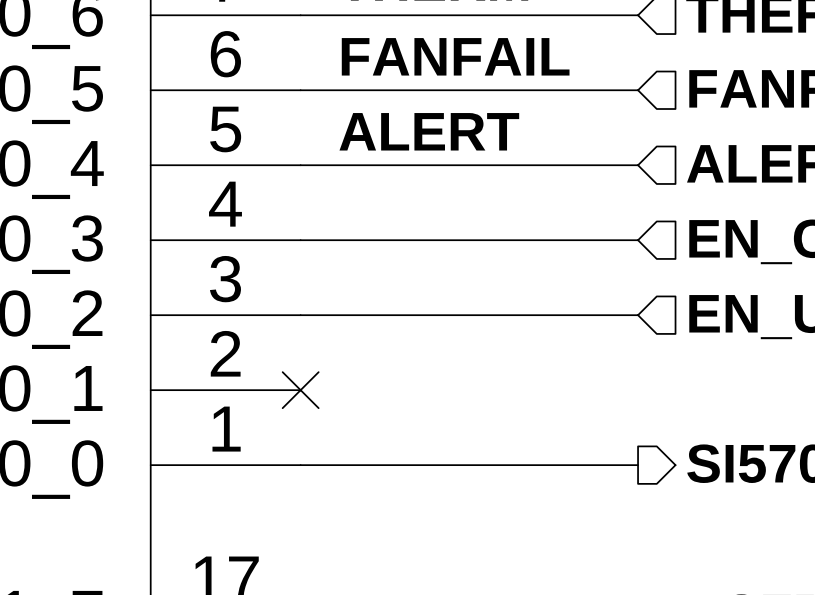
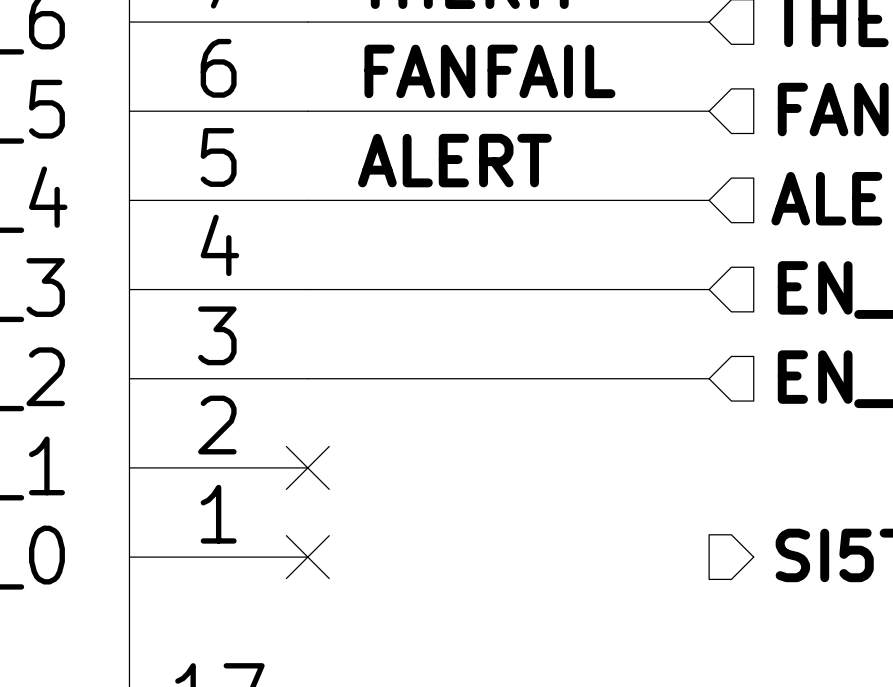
wire: (300, 465) (638, 465) -> none
no-connect mark: none -> (307, 557)

